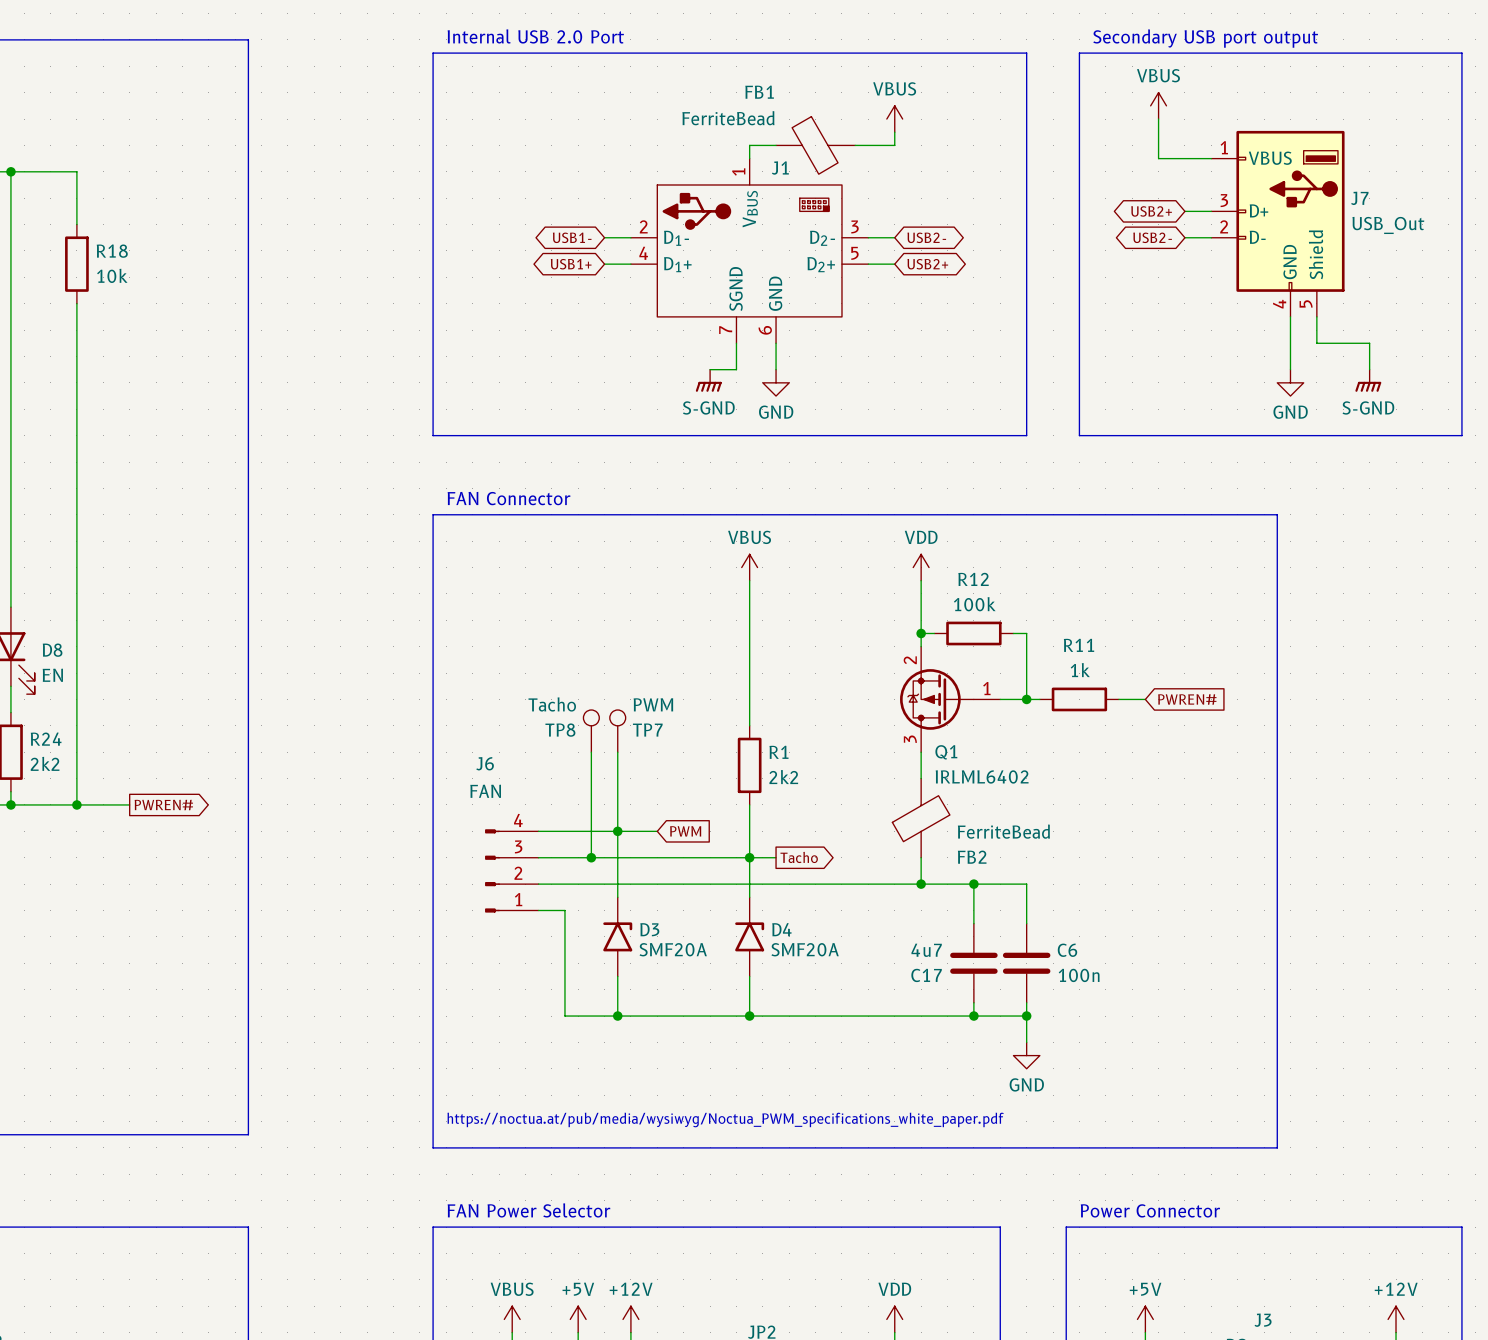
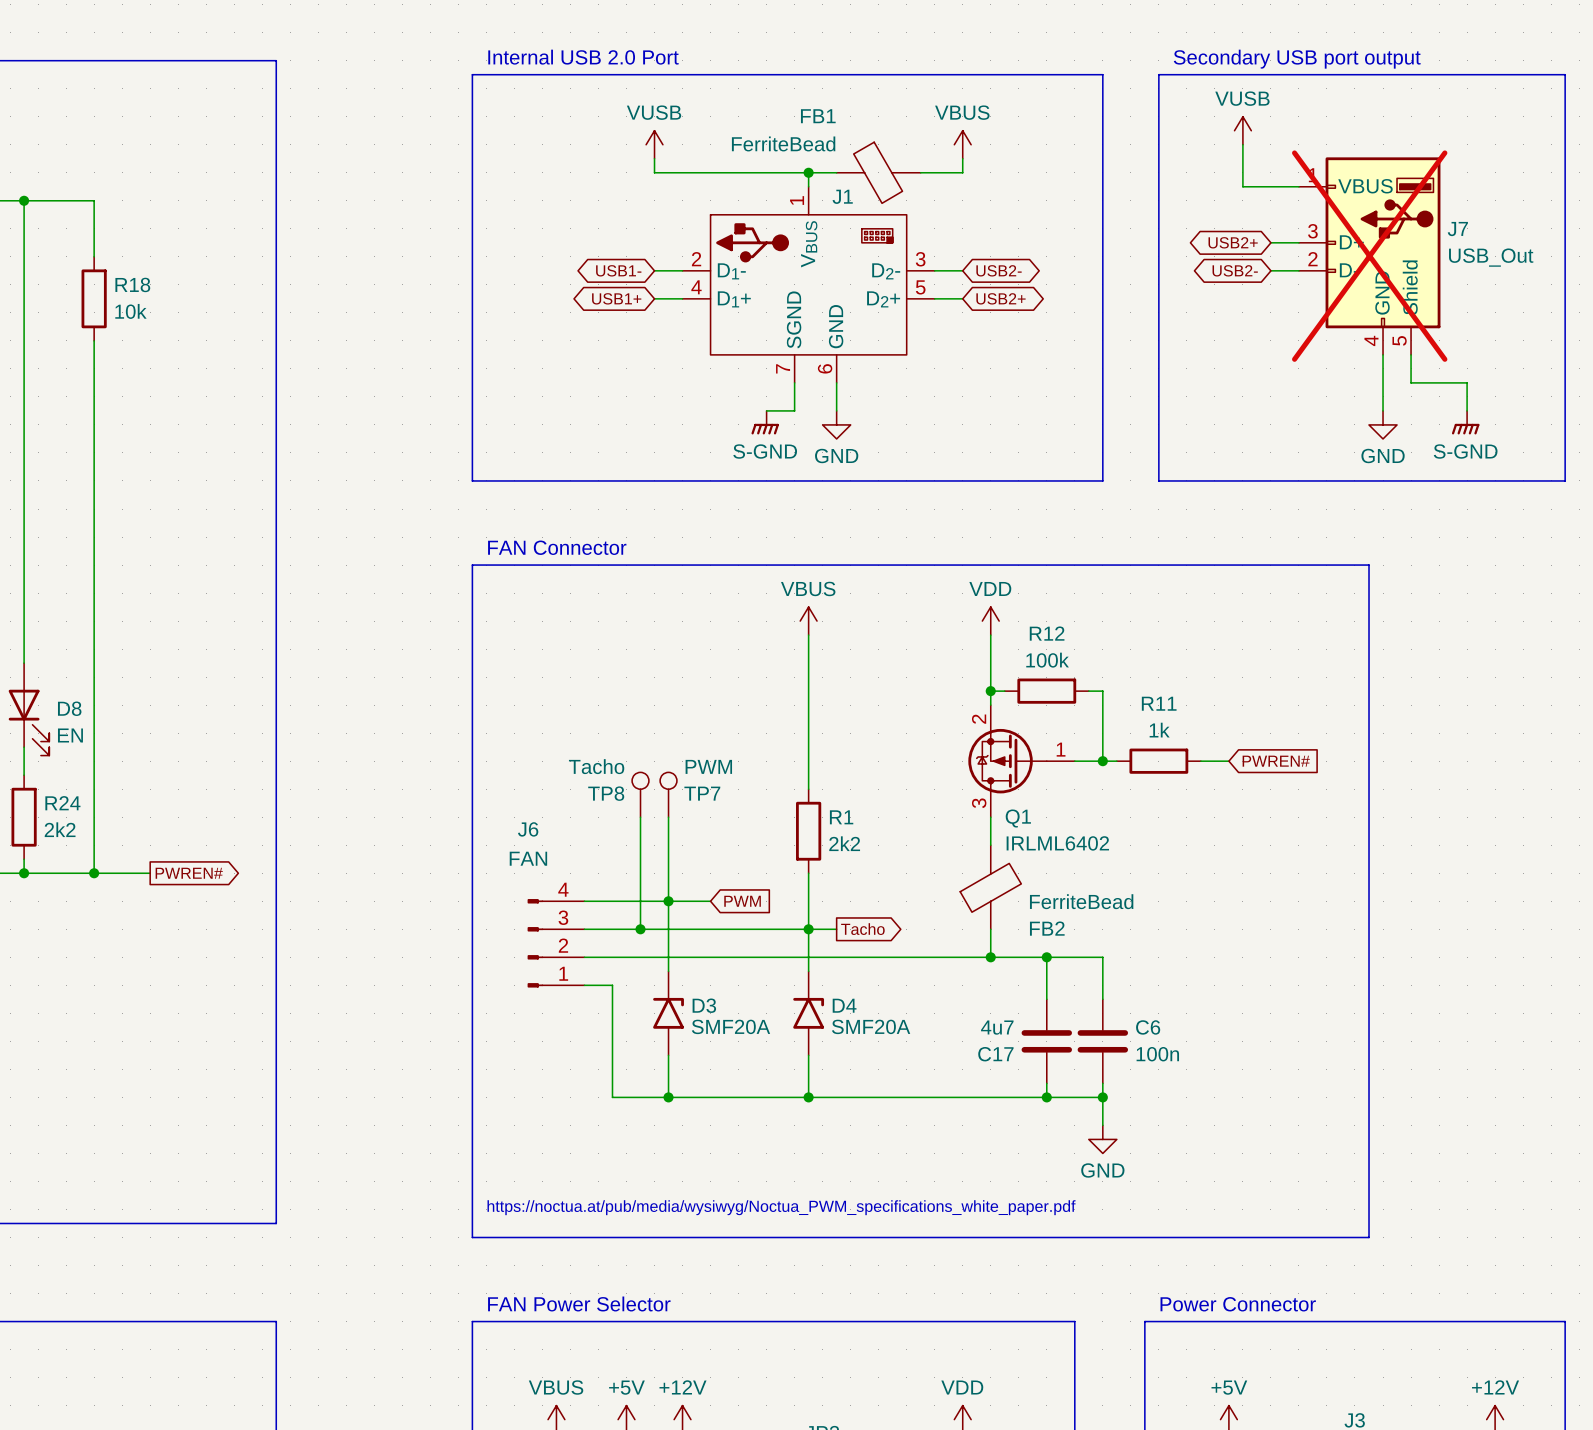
power symbol: VBUS (1158, 105) -> VUSB (1242, 130)
power symbol: none -> VUSB (654, 144)
wire: none -> (654, 158) (654, 172) (808, 172)
junction: none -> (808, 172)
J7 do-not-place cross: none -> (1369, 256)

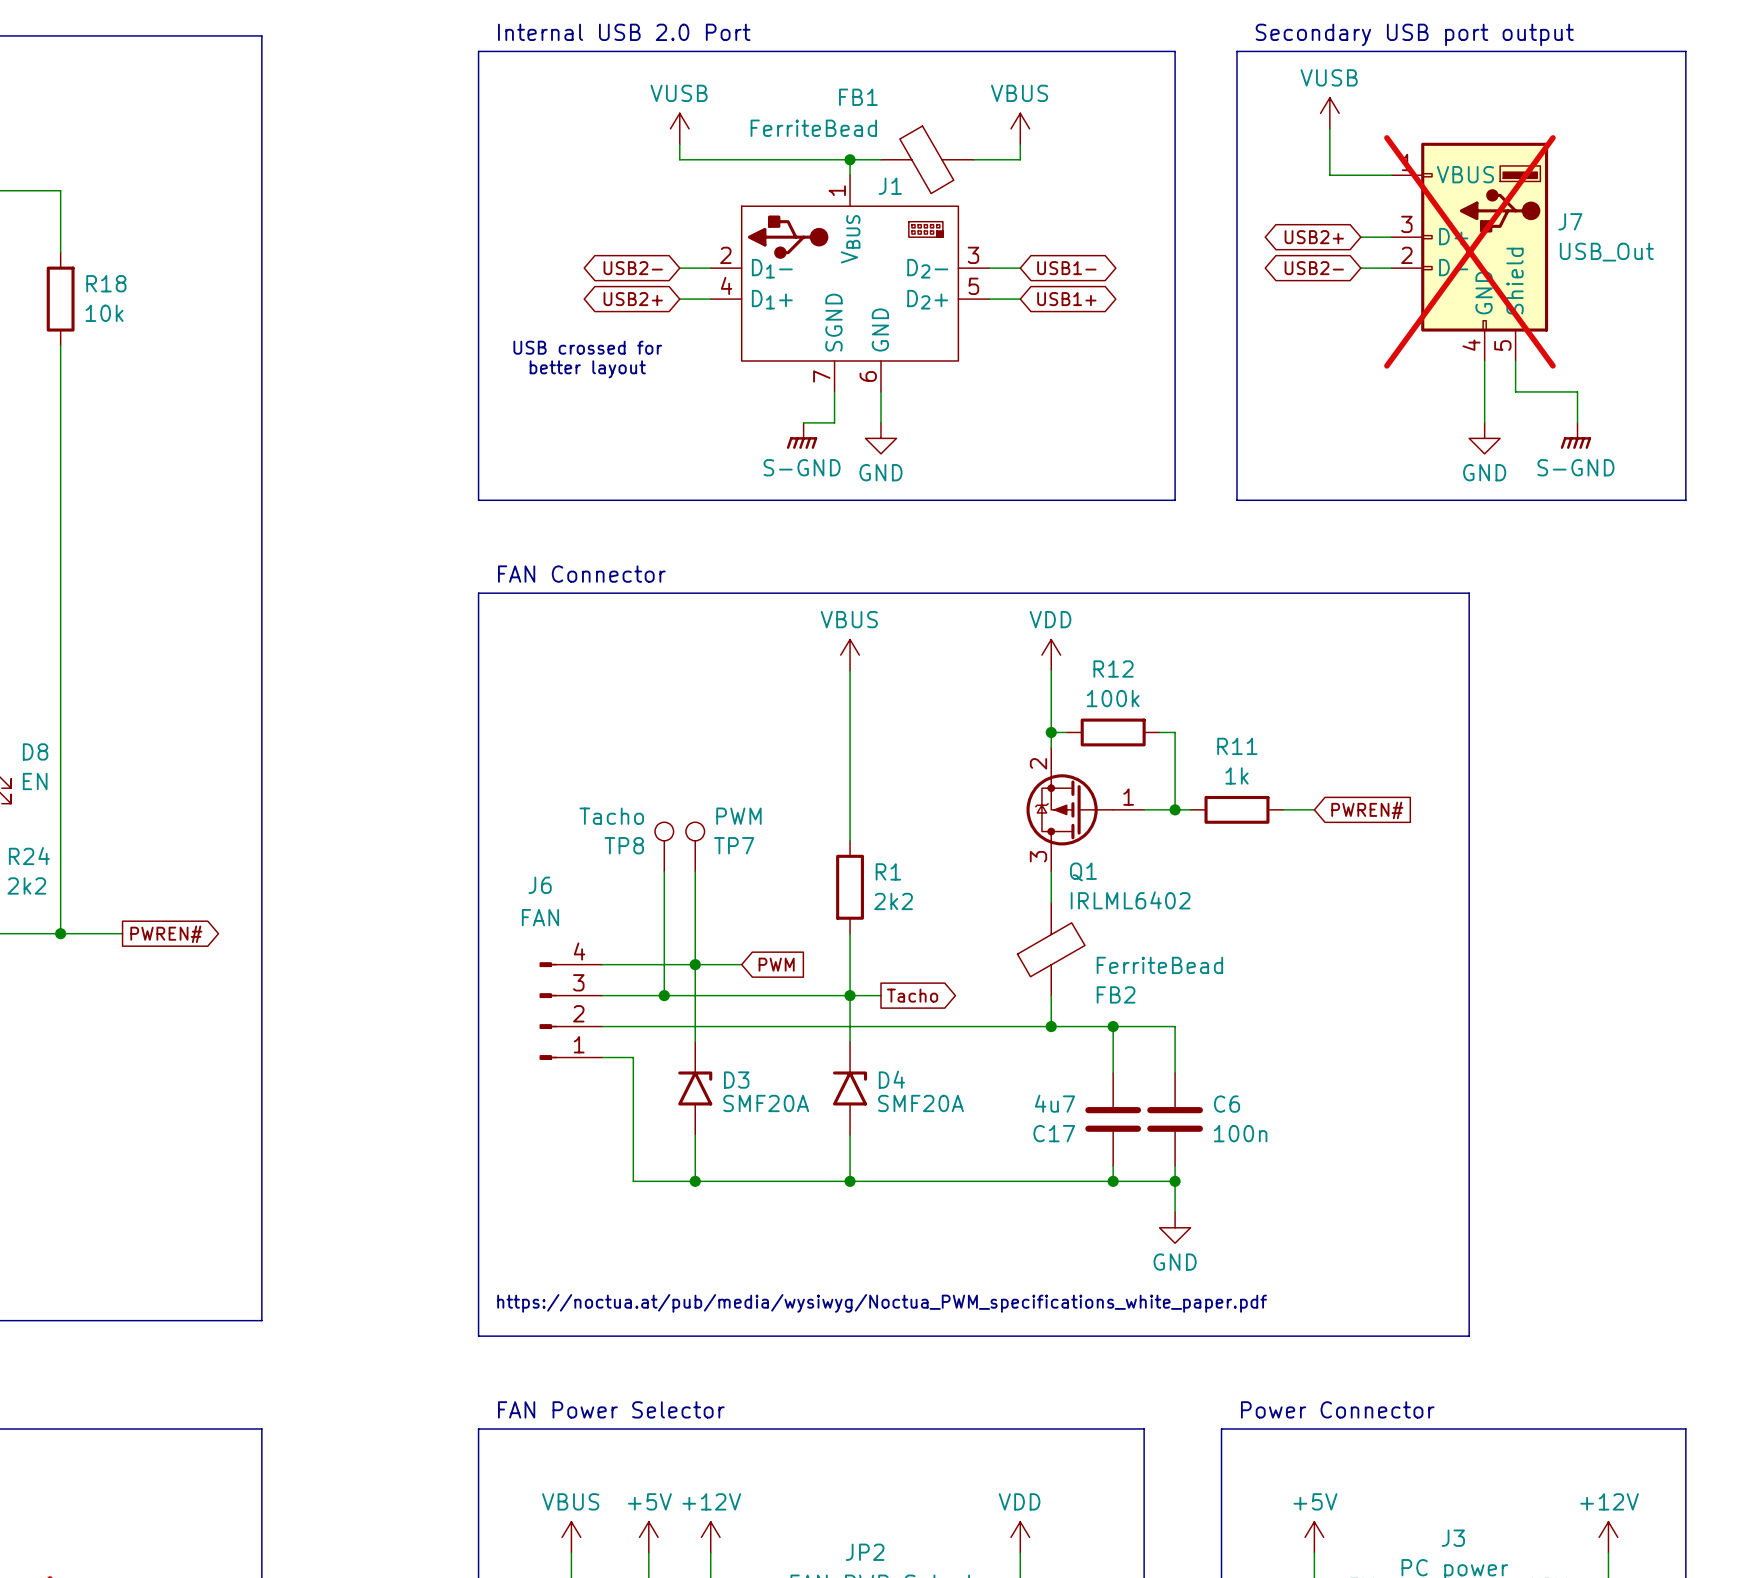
global label: USB1- (618, 270) -> USB2- (633, 268)
global label: USB2- (999, 270) -> USB1- (1066, 268)
global label: USB1+ (616, 298) -> USB2+ (633, 299)
global label: USB2+ (1000, 298) -> USB1+ (1066, 299)
text: none -> USB crossed for (587, 347)
text: none -> better layout (587, 369)

